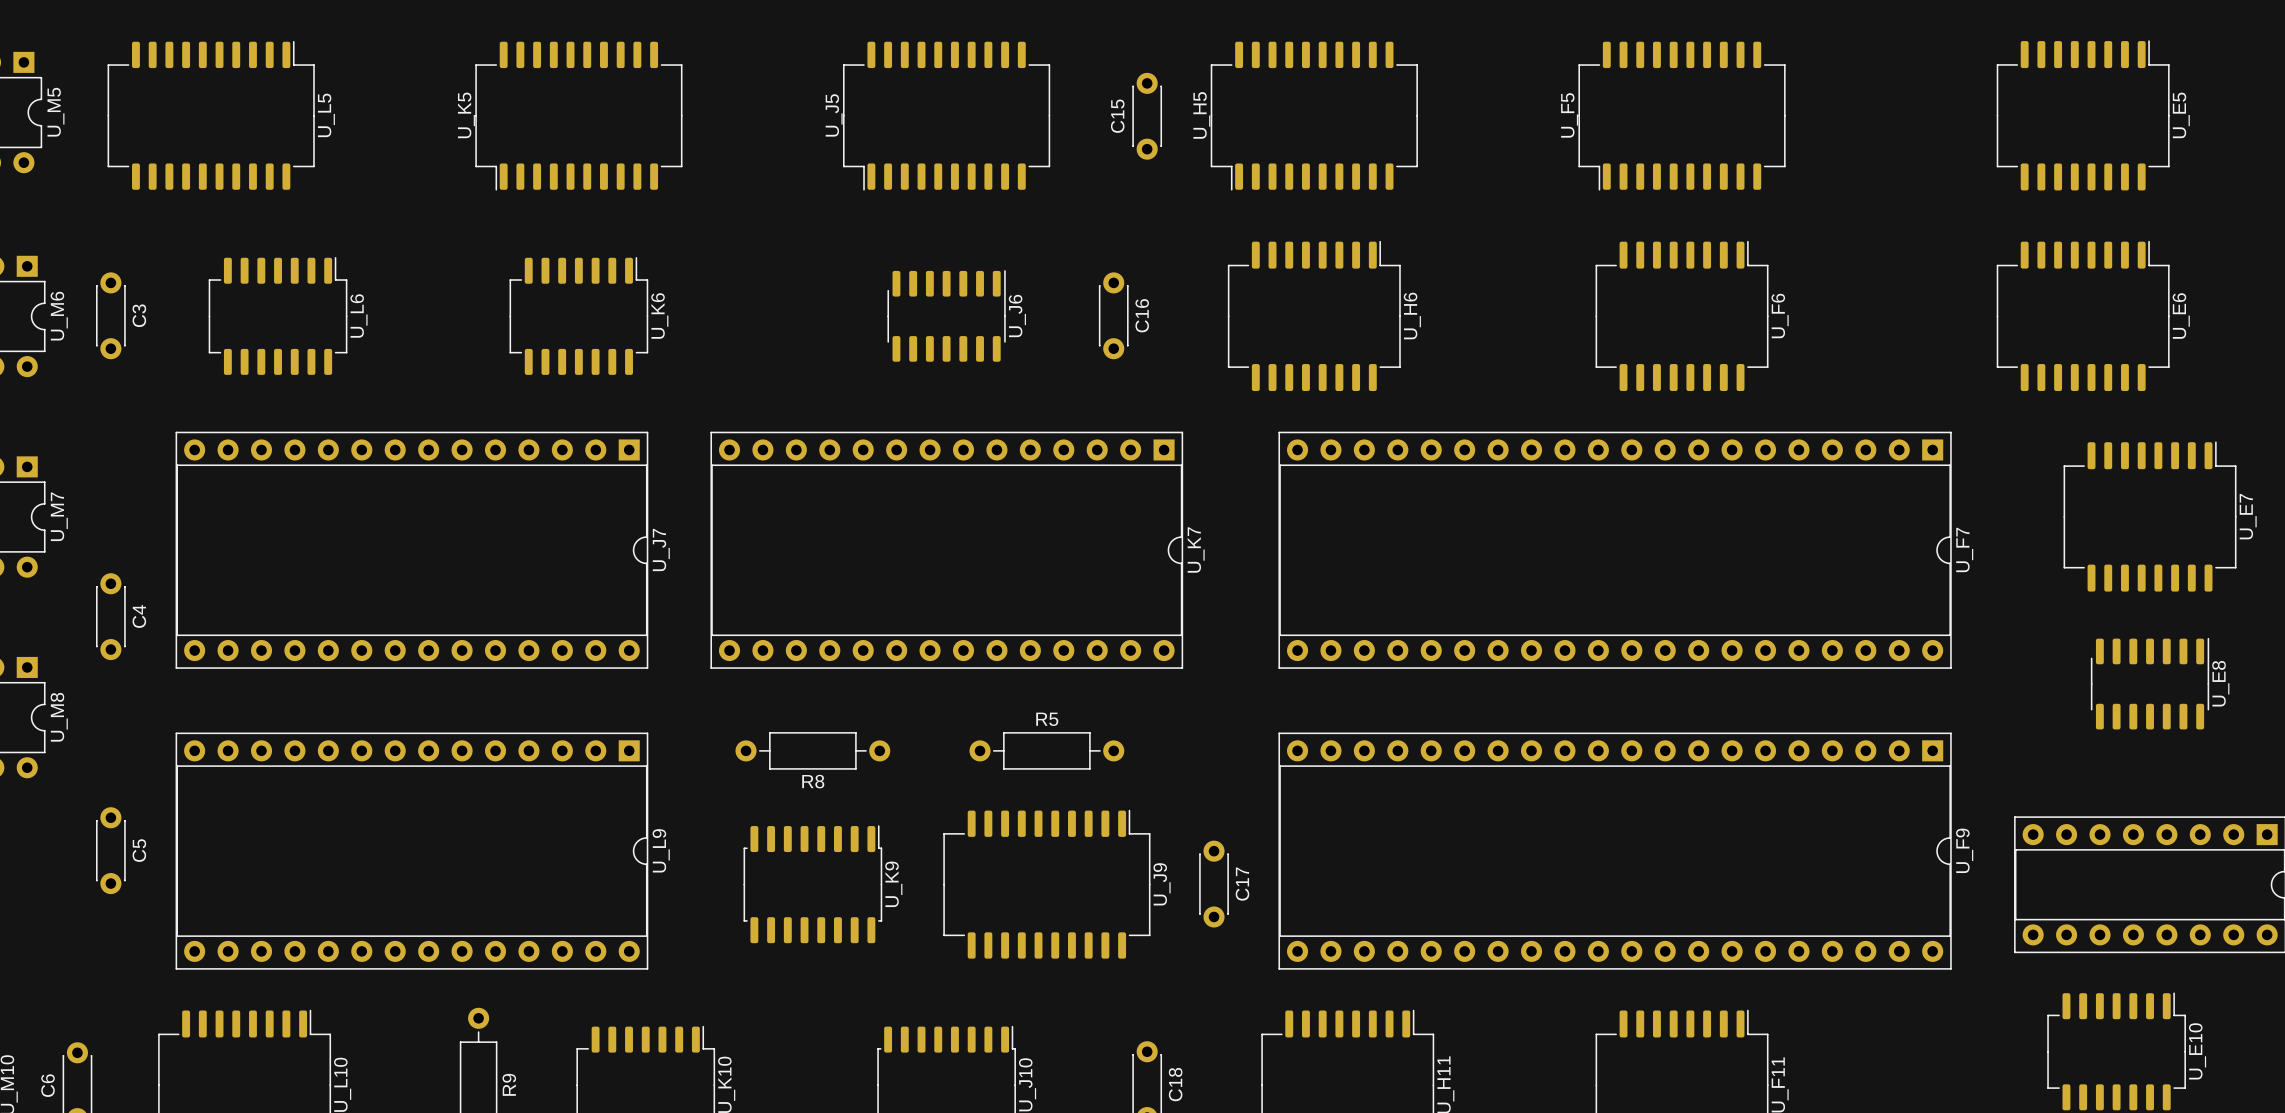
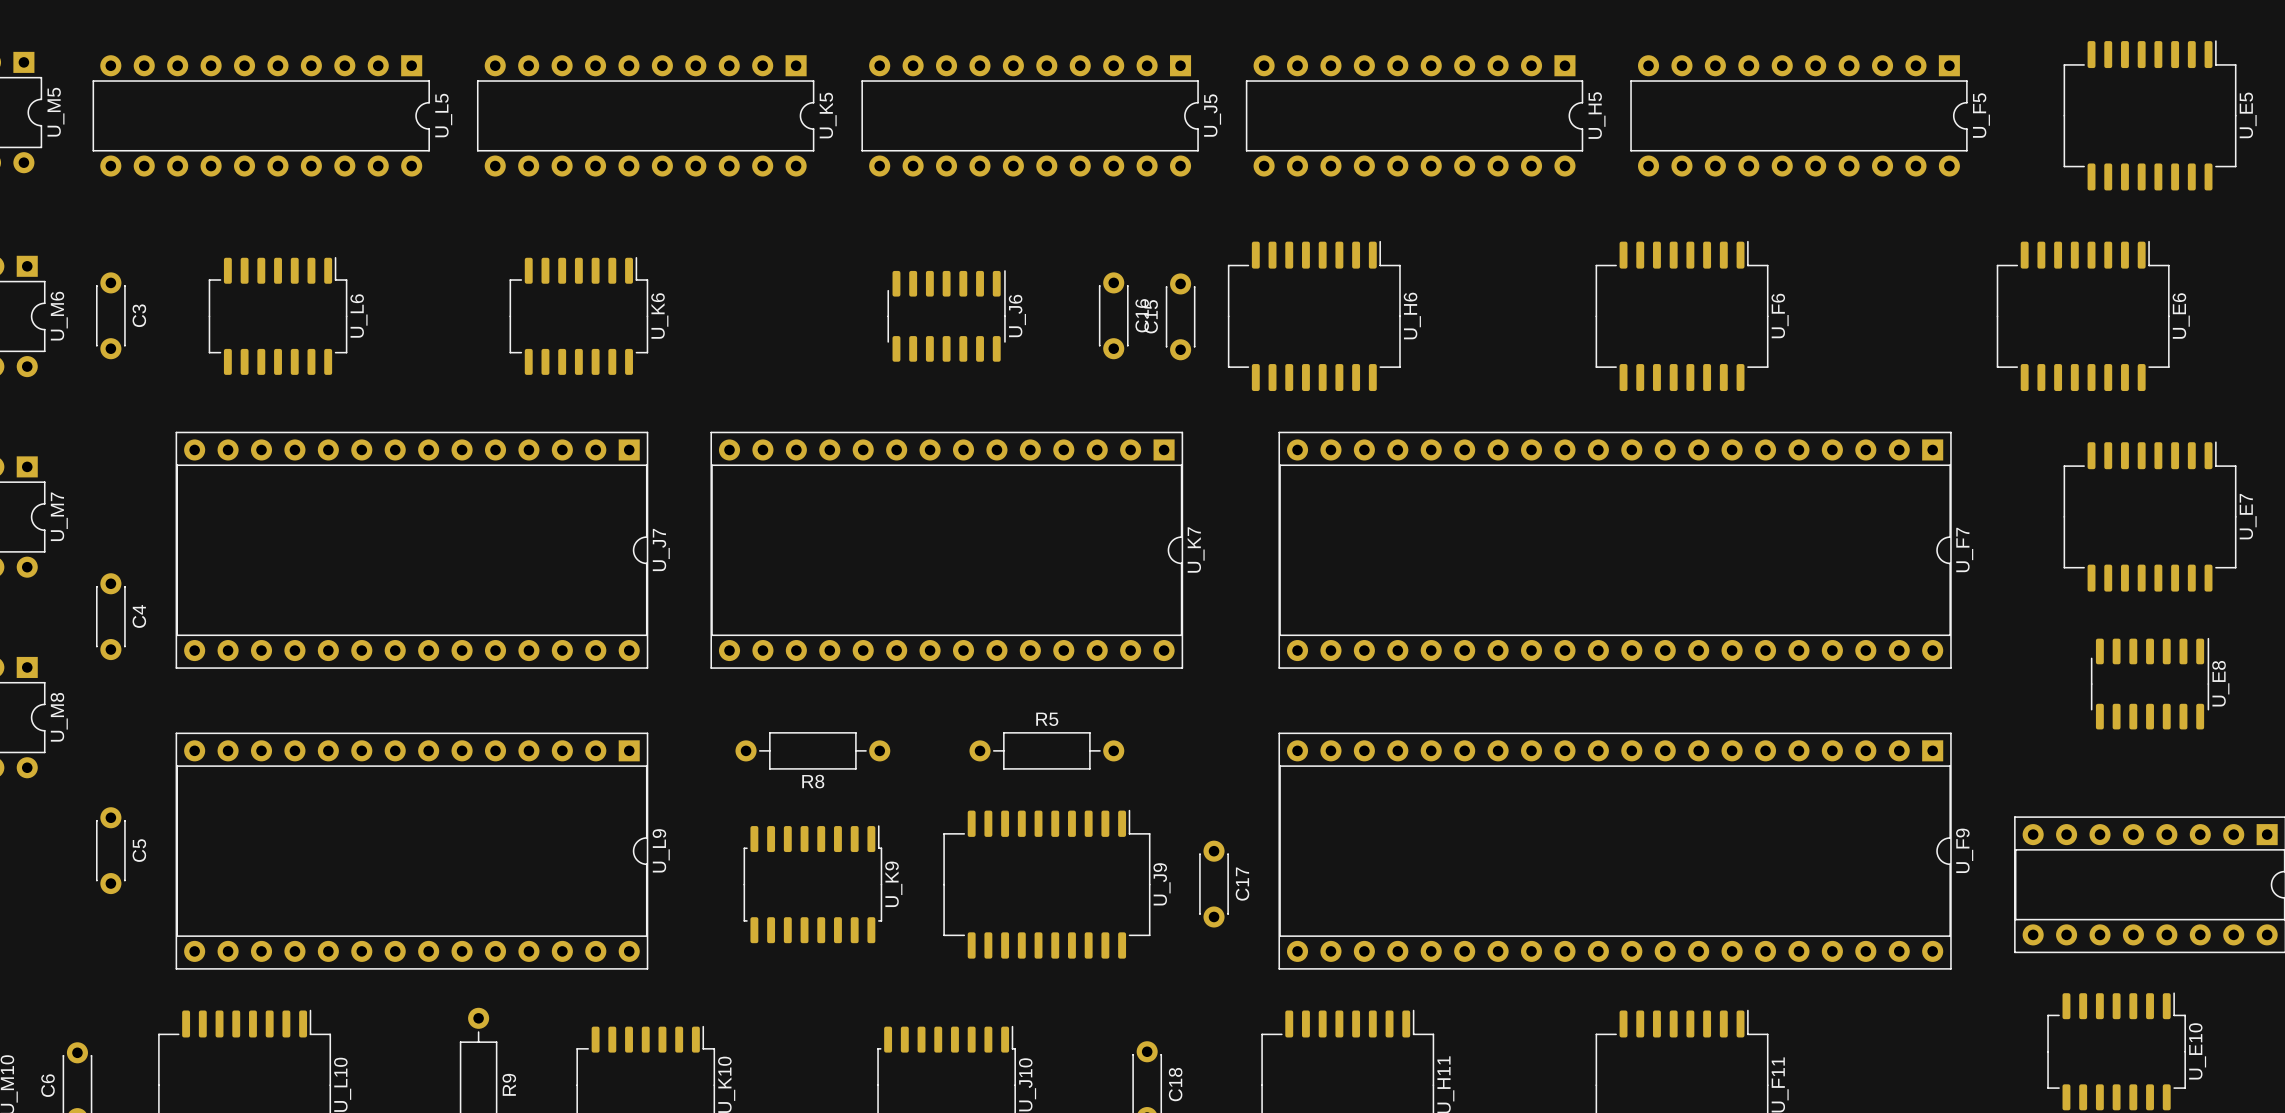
U_L5 footprint: [107, 40, 315, 190] -> [92, 55, 430, 177]
U_K5 footprint: [475, 41, 683, 191] -> [476, 55, 815, 177]
U_J5 footprint: [842, 41, 1051, 191] -> [861, 55, 1199, 177]
U_H5 footprint: [1210, 41, 1418, 191] -> [1245, 55, 1584, 177]
U_F5 footprint: [1578, 41, 1786, 191] -> [1630, 55, 1968, 177]
U_L5 name position: U_L5 (326, 115) -> U_L5 (443, 115)
U_K5 name position: U_K5 (466, 115) -> U_K5 (828, 115)
U_J5 name position: U_J5 (834, 115) -> U_J5 (1212, 115)
U_H5 name position: U_H5 (1201, 115) -> U_H5 (1597, 115)
U_F5 name position: U_F5 (1569, 115) -> U_F5 (1981, 115)
U_E5 position: (2083, 115) -> (2150, 115)
C15 position: (1147, 116) -> (1180, 316)

